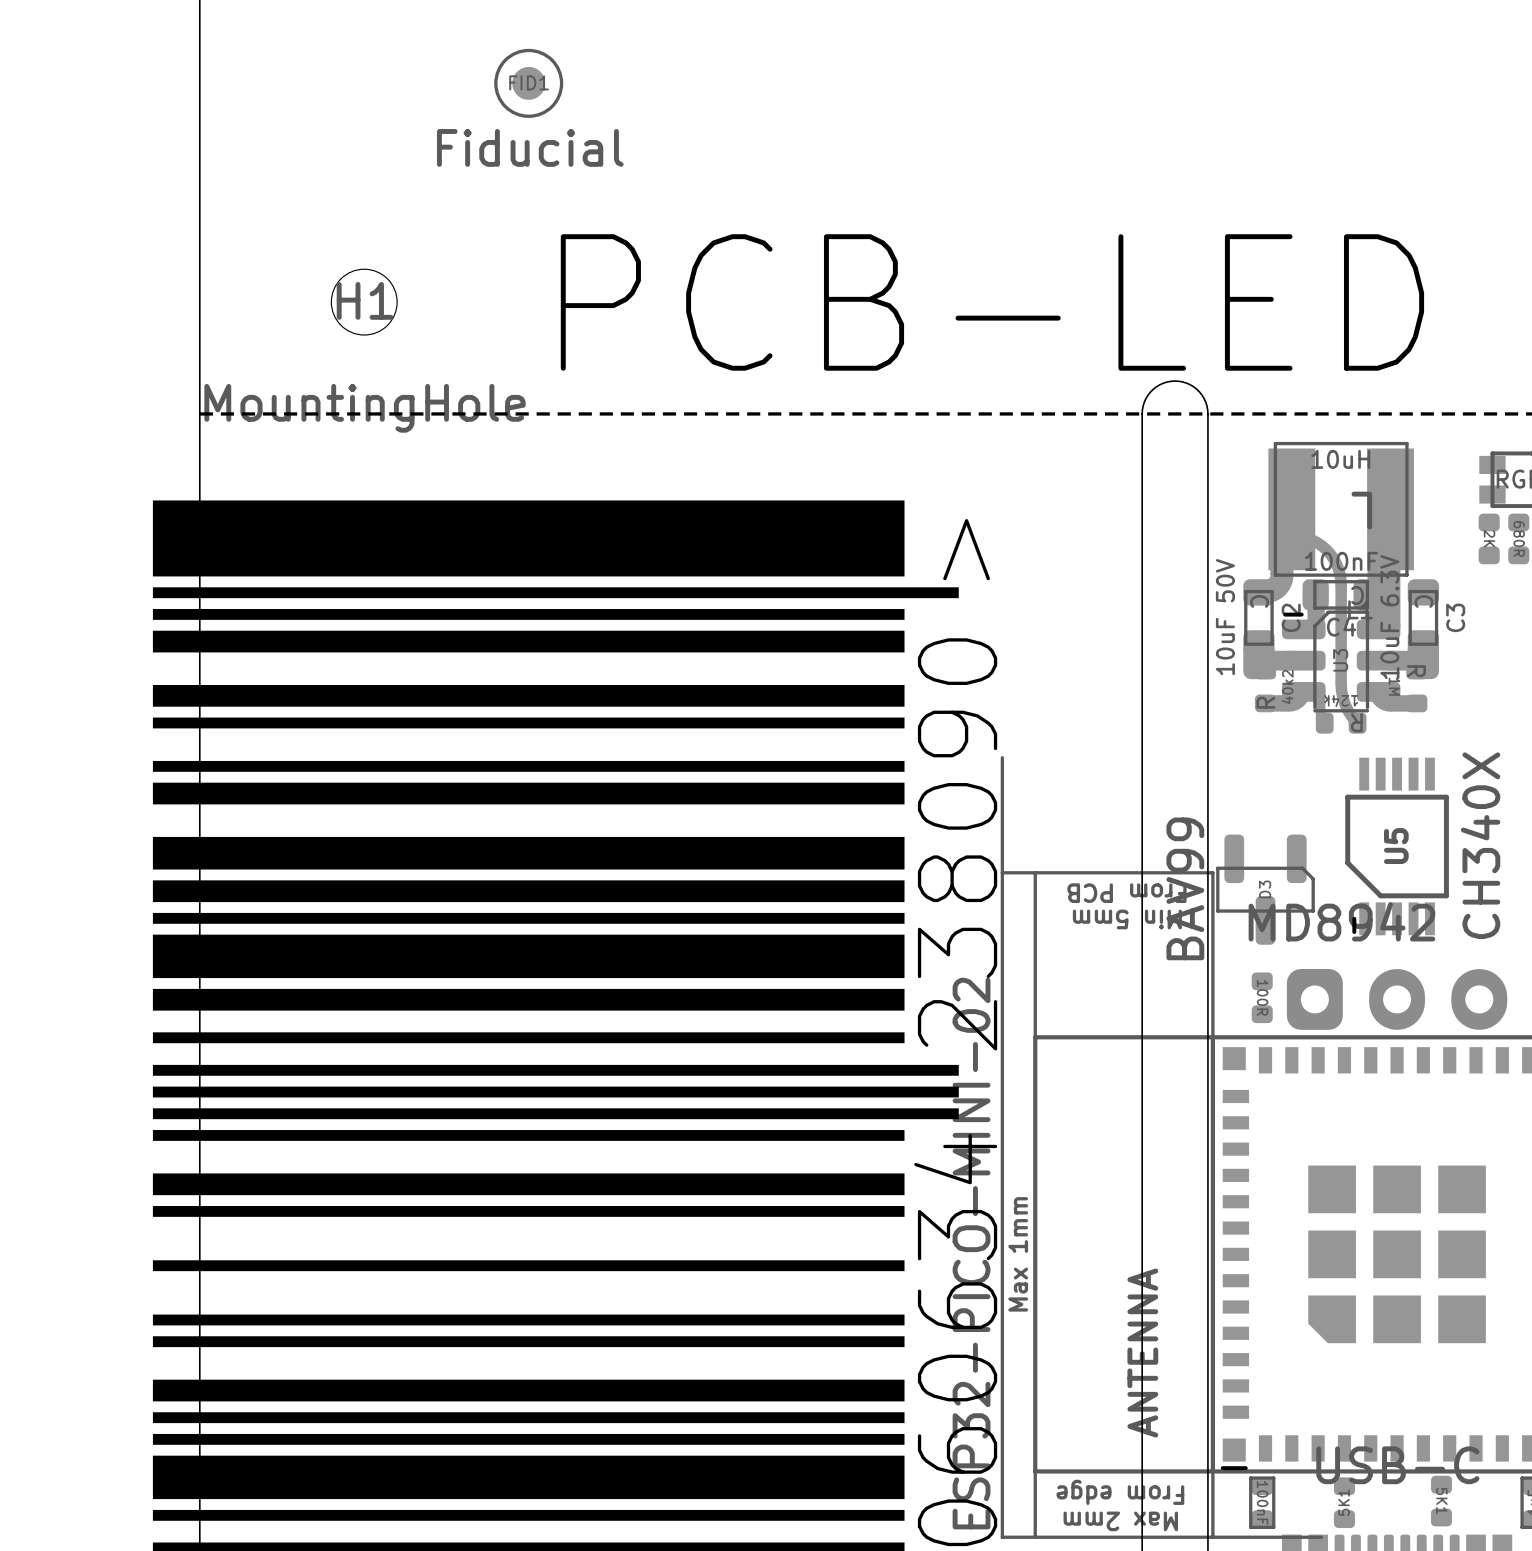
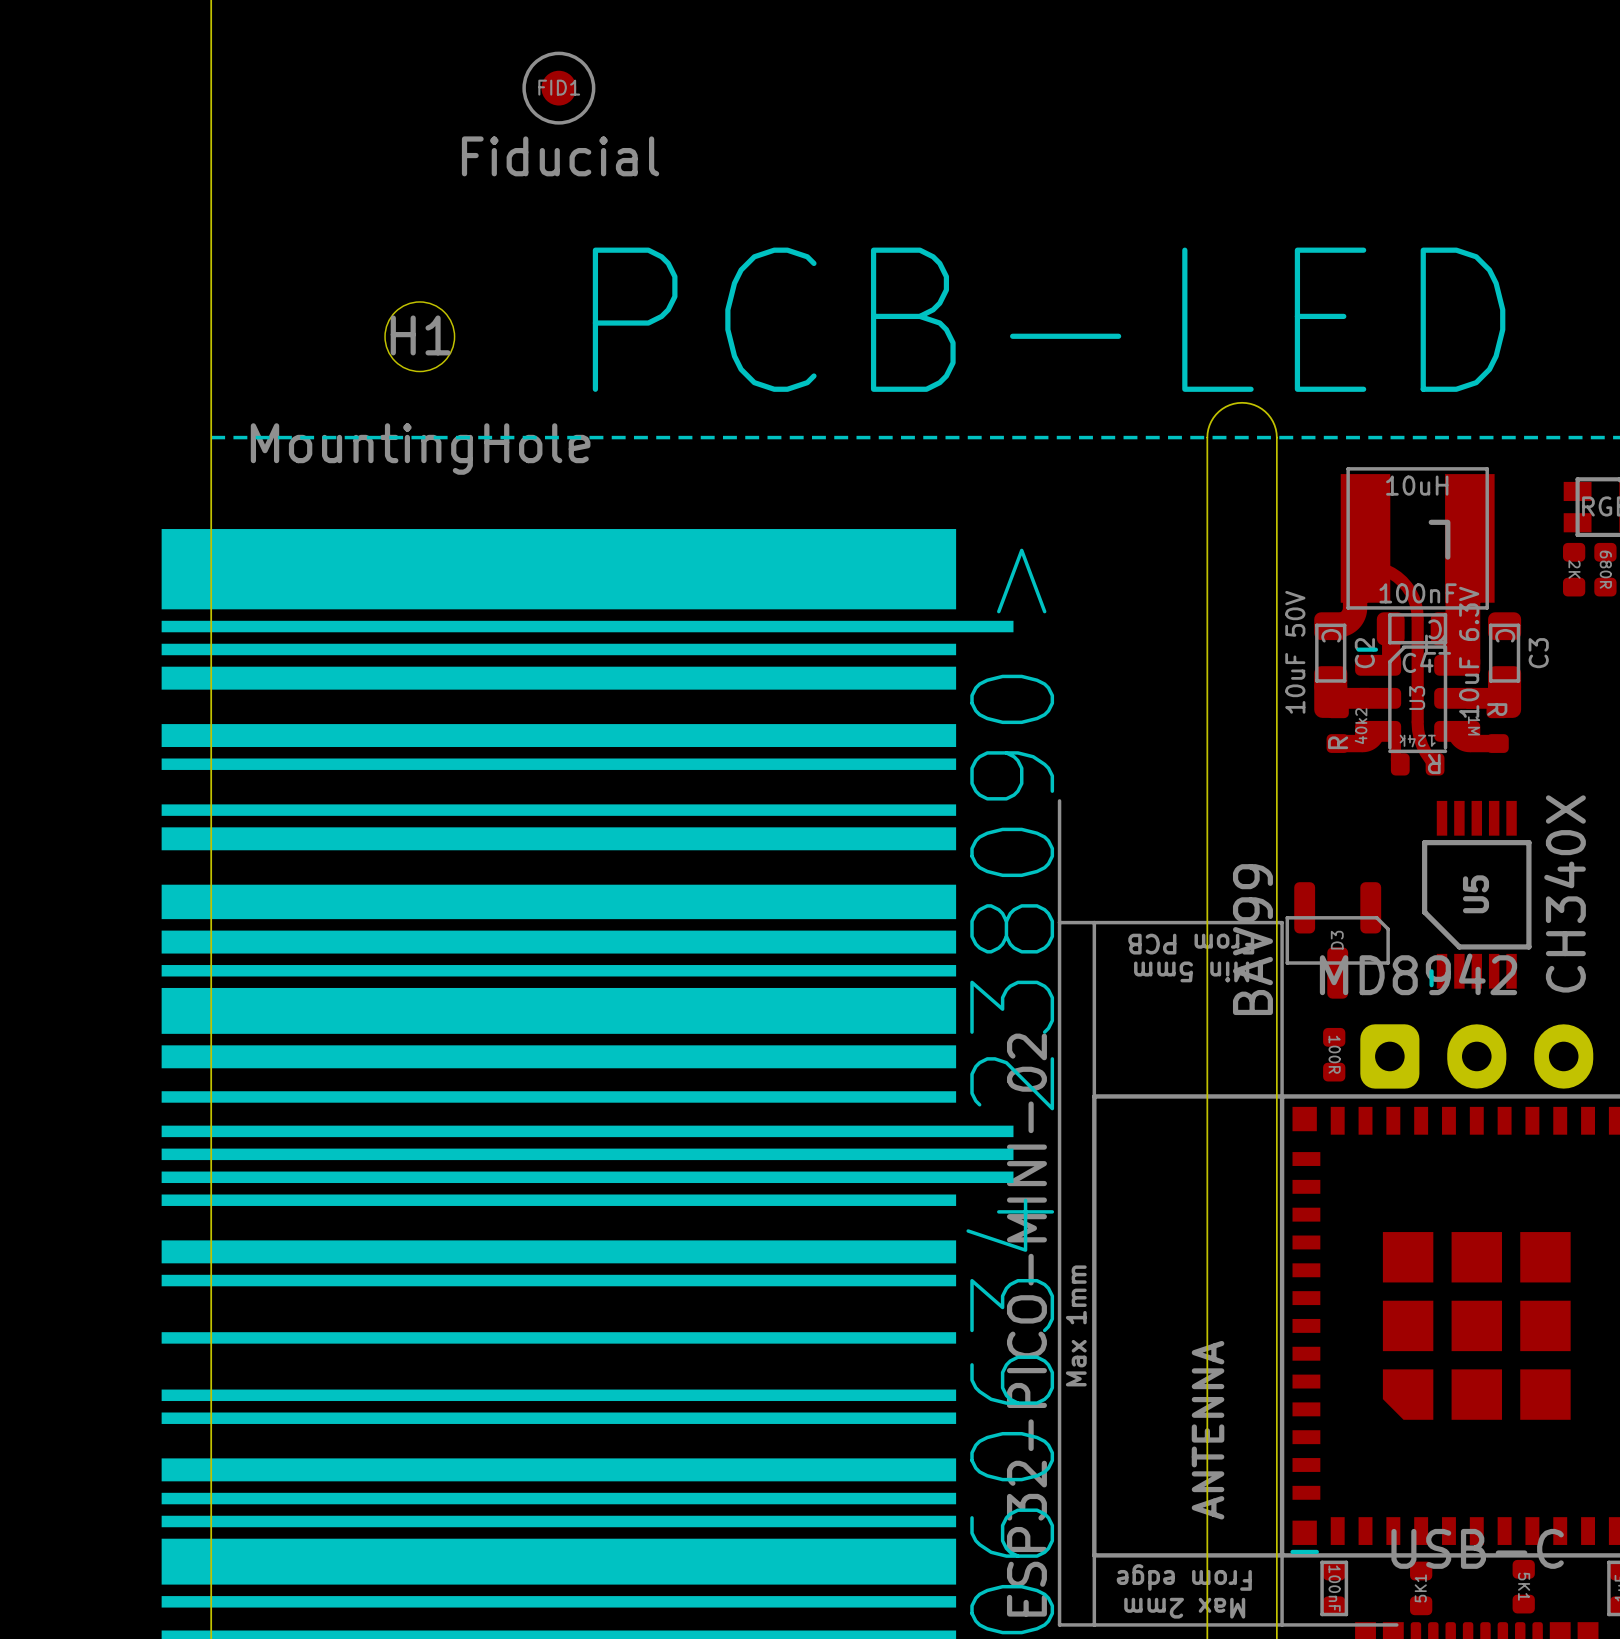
H1 position: (364, 302) -> (419, 336)

